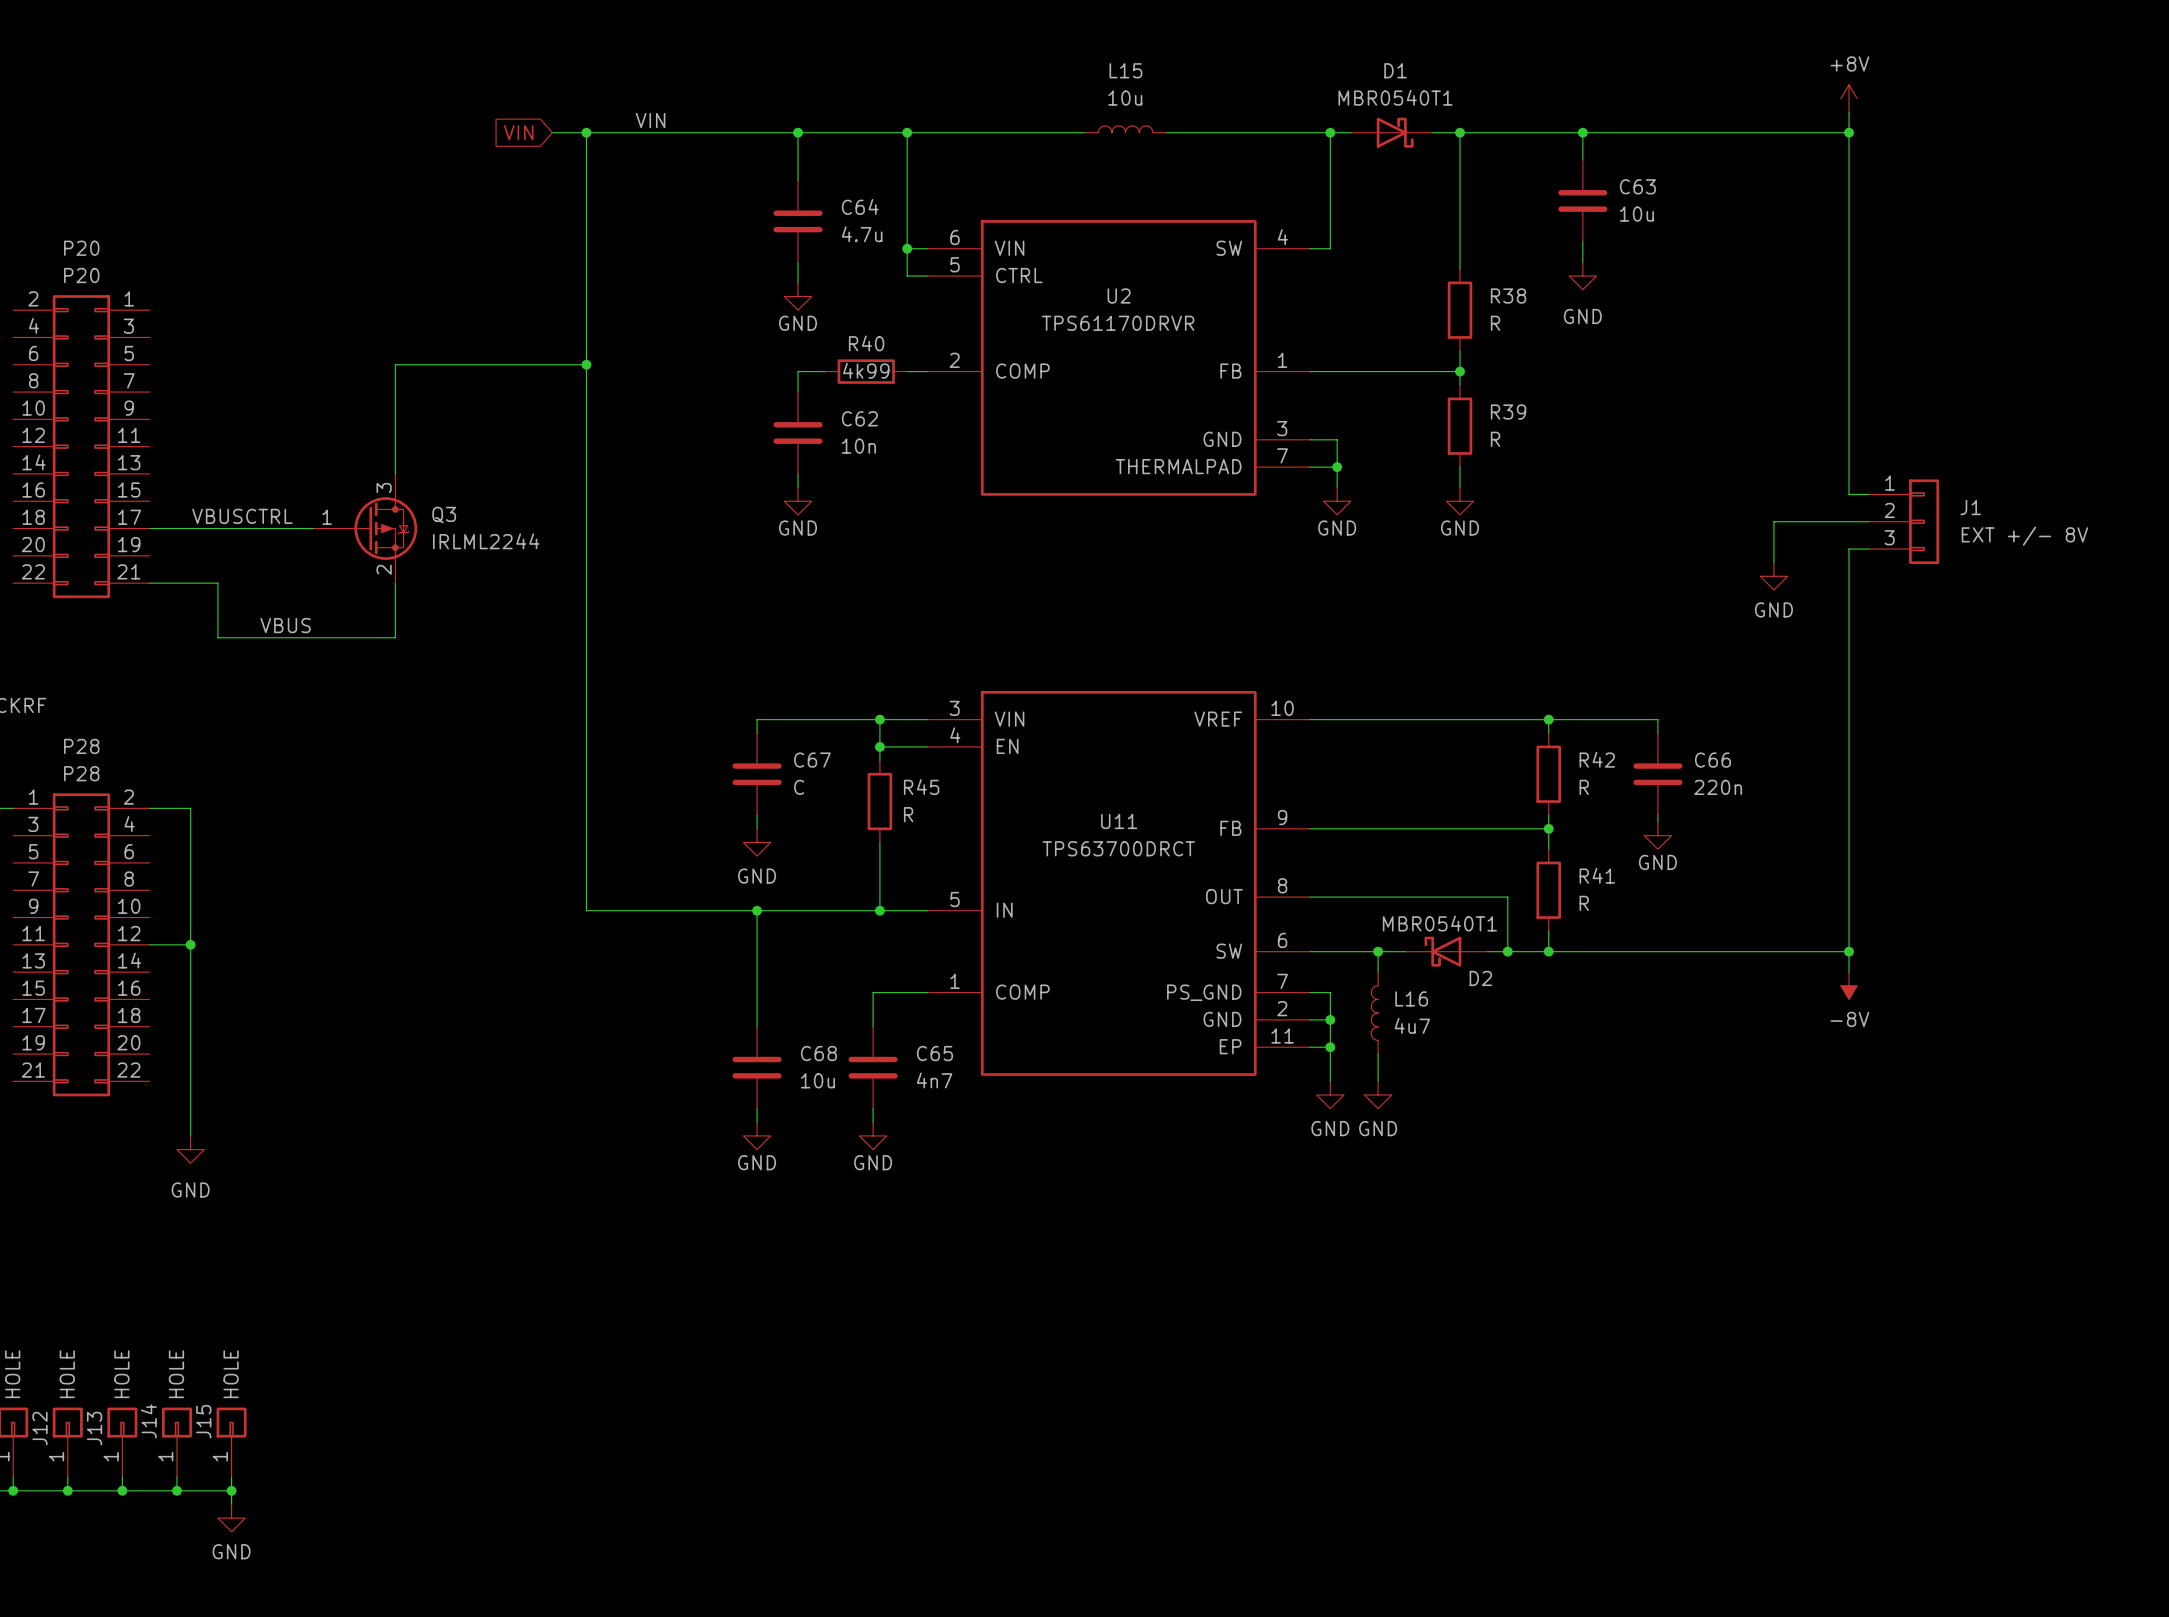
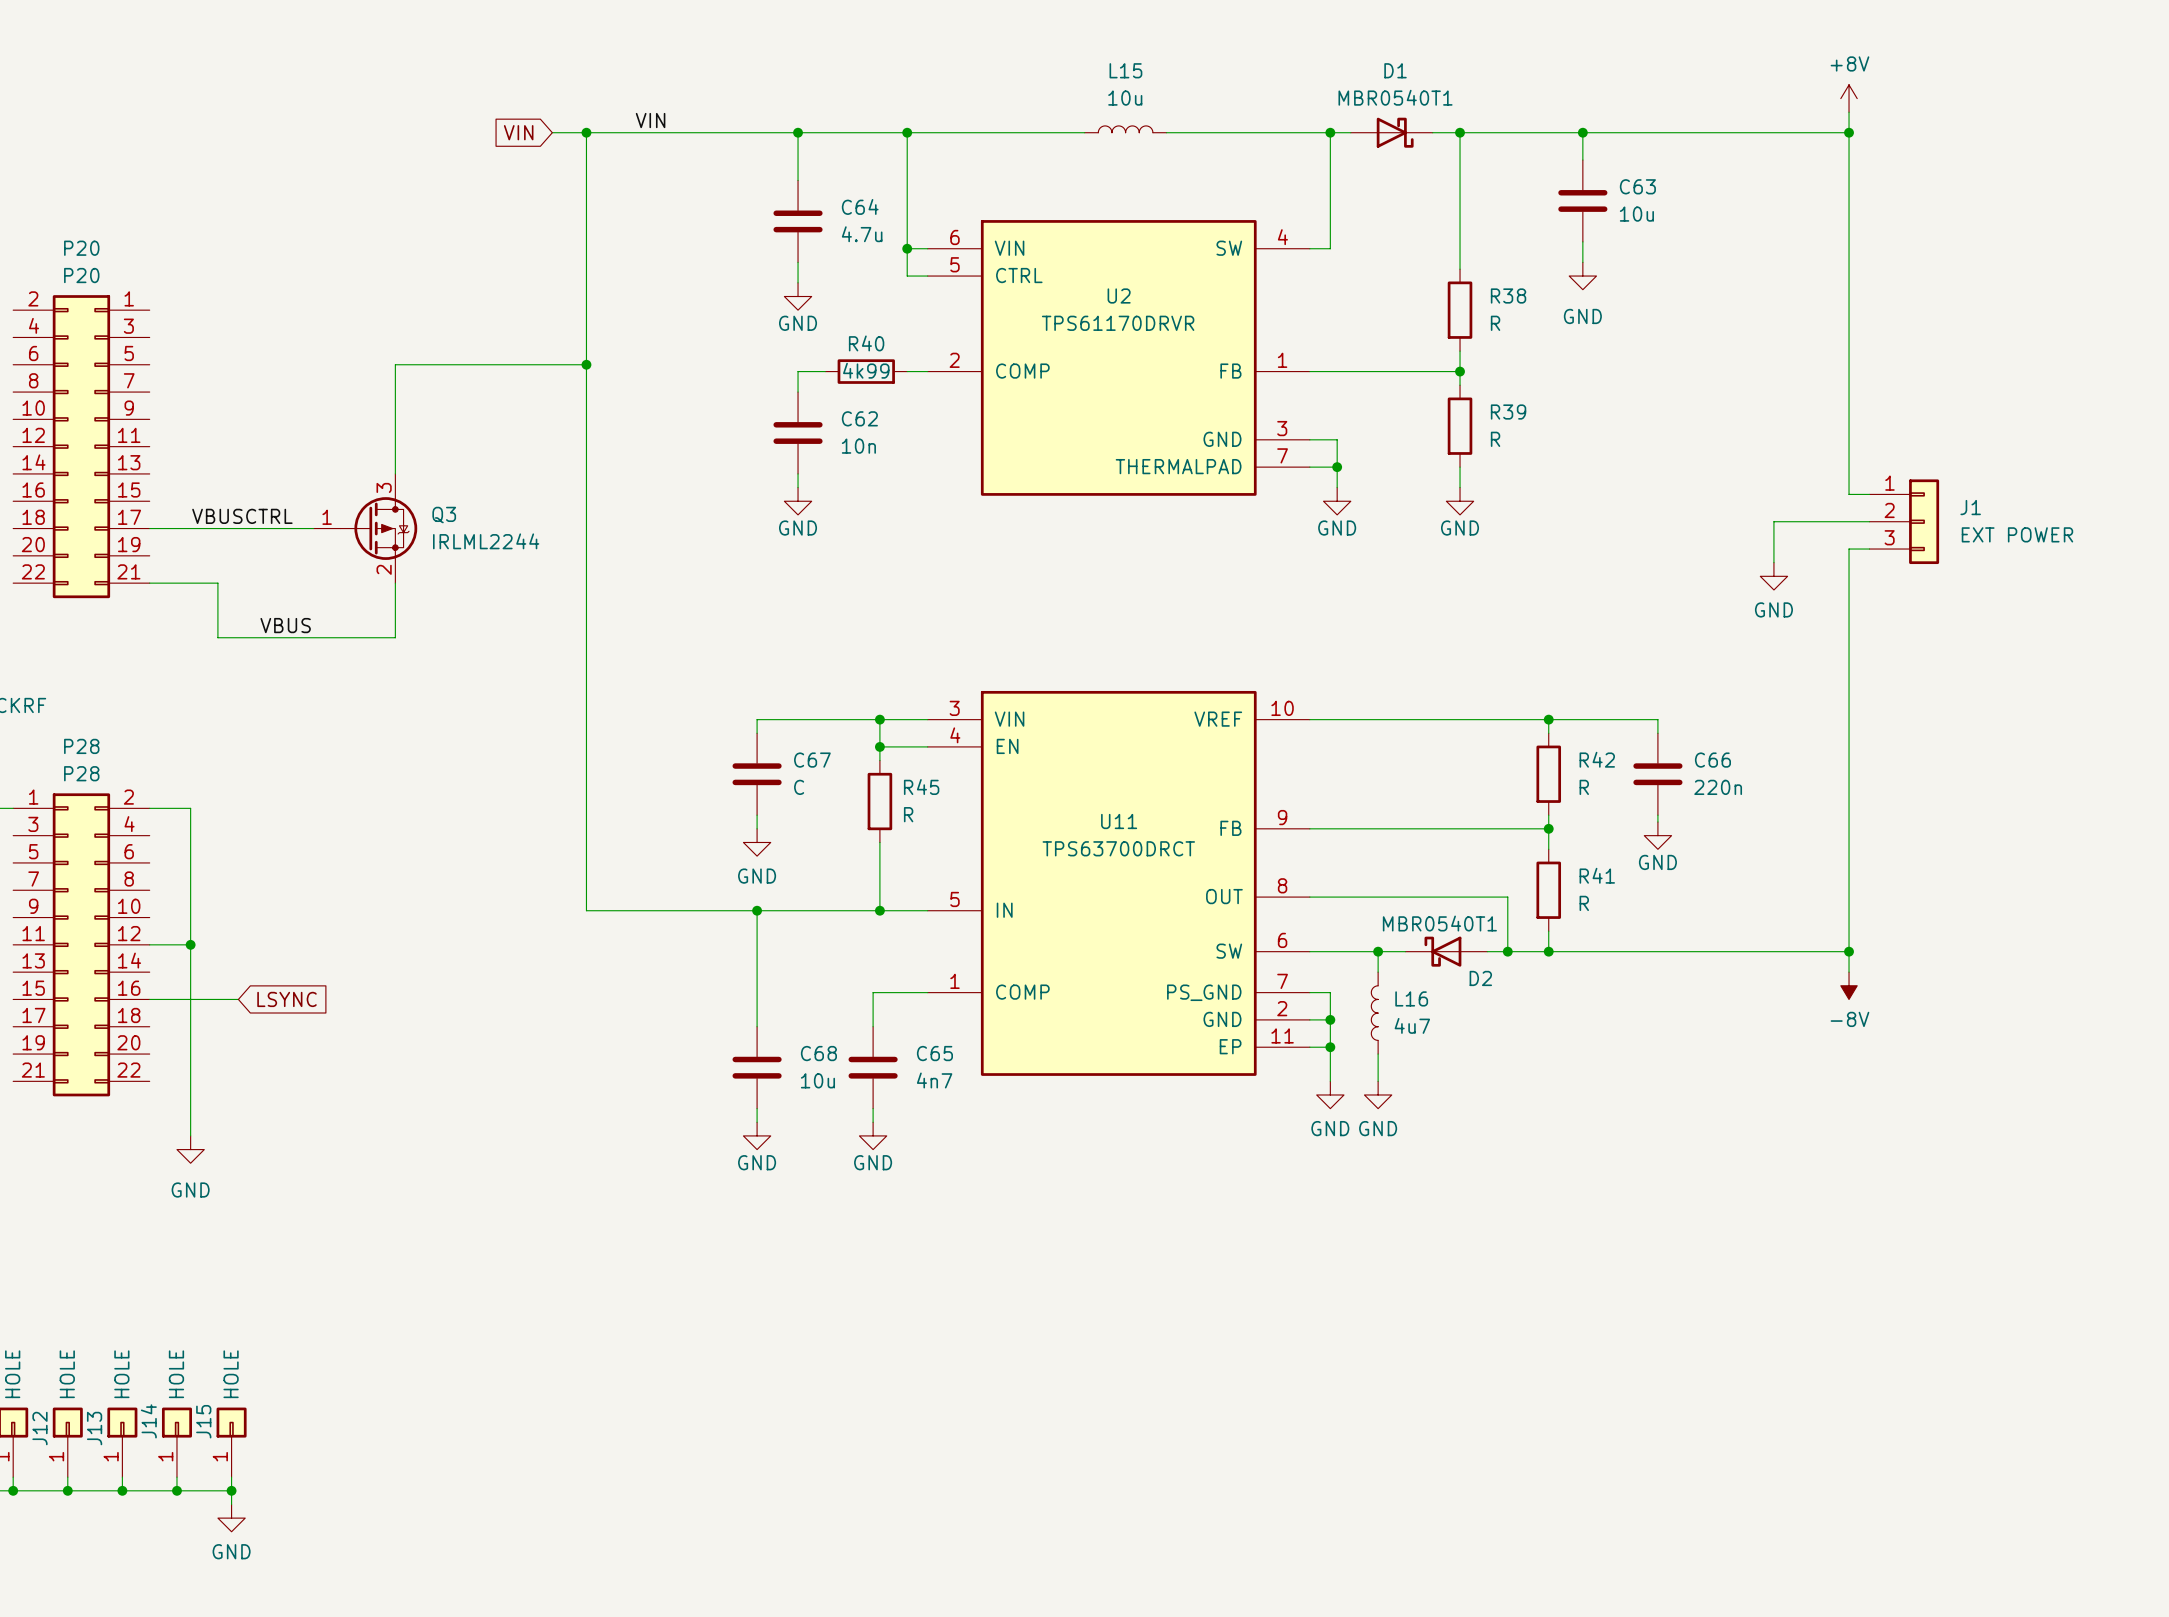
J1 value: EXT +/- 8V (2024, 536) -> EXT POWER (2017, 534)
wire: none -> (149, 999) (238, 999)
global label: none -> LSYNC (287, 999)

